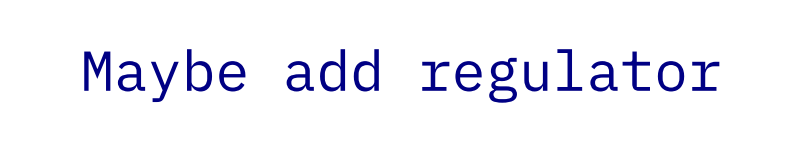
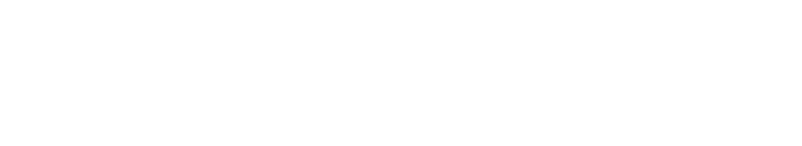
text: Maybe add regulator (401, 75) -> none

